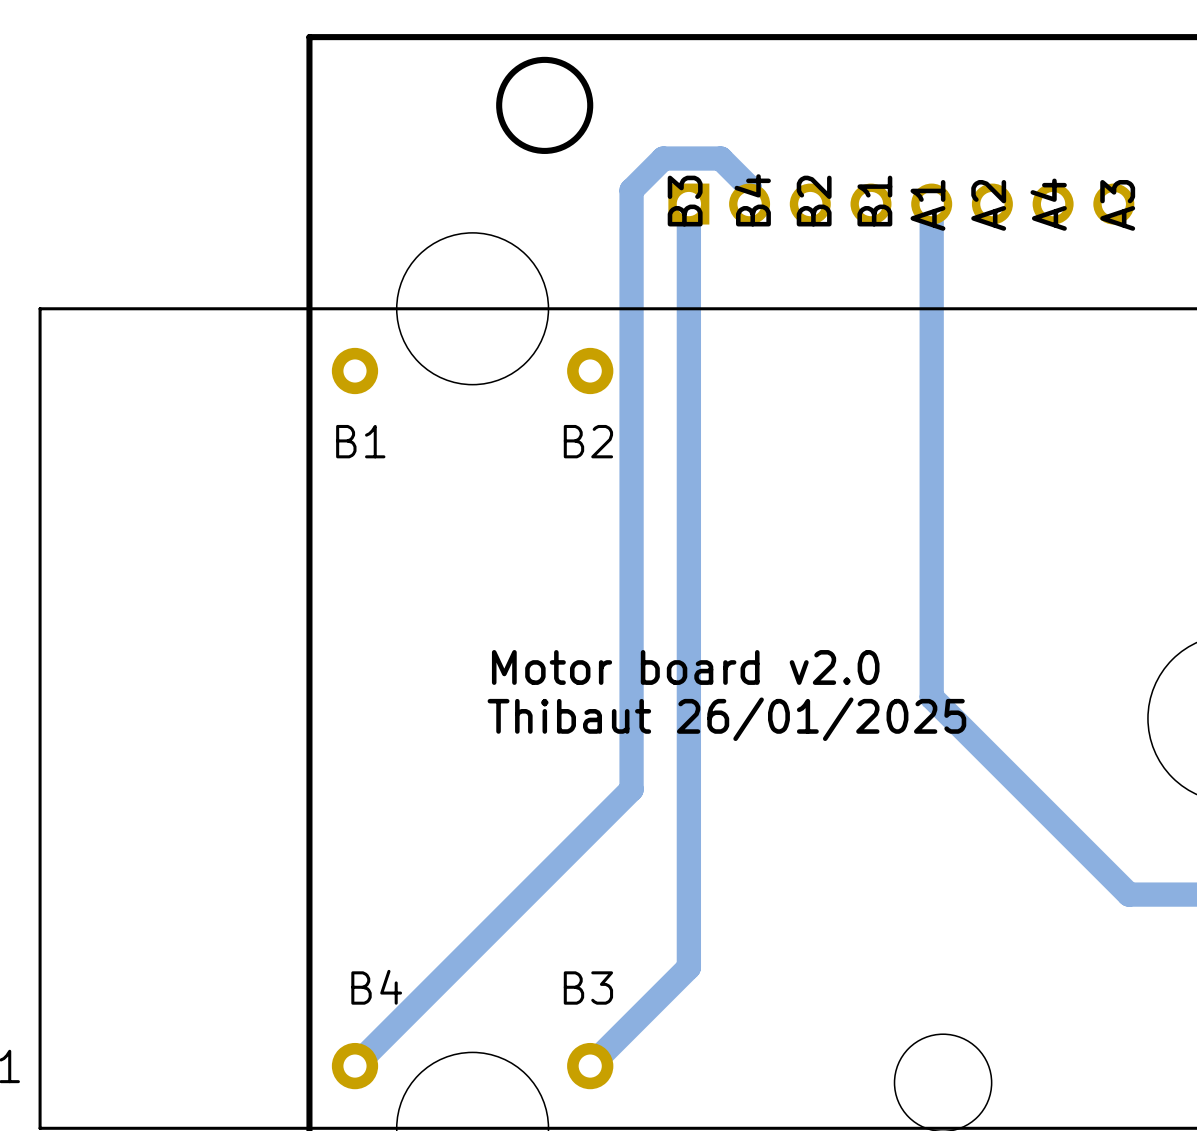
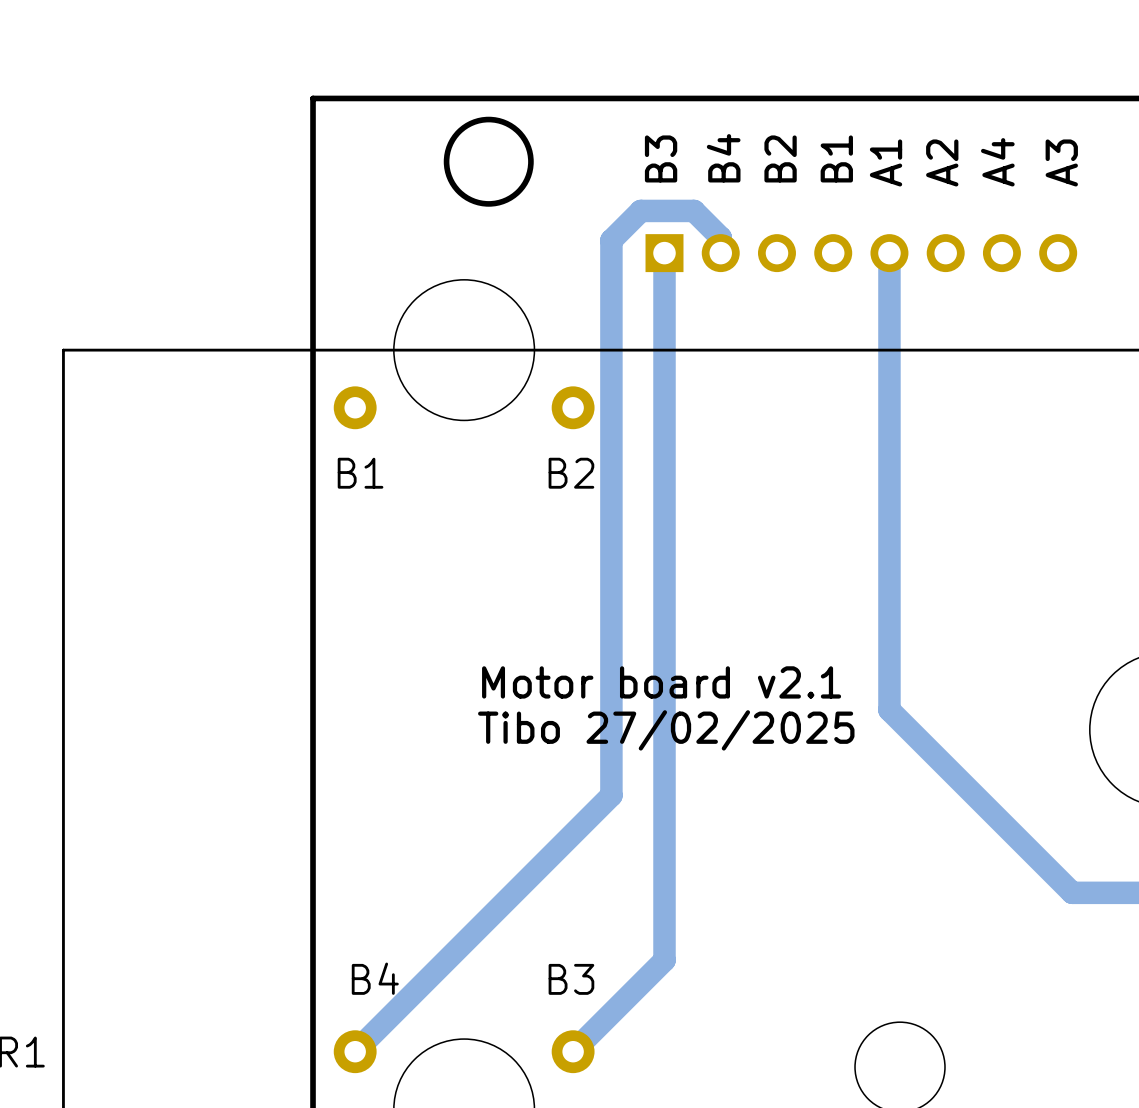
round board edge position: (544, 105) -> (488, 161)
text position: B4 (752, 200) -> B4 (723, 158)
text position: B3 (685, 201) -> B3 (661, 158)
text position: B2 (814, 201) -> B2 (780, 158)
text position: B1 (874, 201) -> B1 (836, 158)
text position: A4 (1048, 204) -> A4 (997, 162)
text position: A1 (927, 205) -> A1 (886, 162)
text position: A2 (988, 205) -> A2 (942, 162)
text position: A3 (1117, 205) -> A3 (1061, 162)
text: Motor board v2.0 (685, 667) -> Motor board v2.1 (661, 682)
text: Thibaut 26/01/2025 (726, 719) -> Tibo 27/02/2025 (666, 730)

